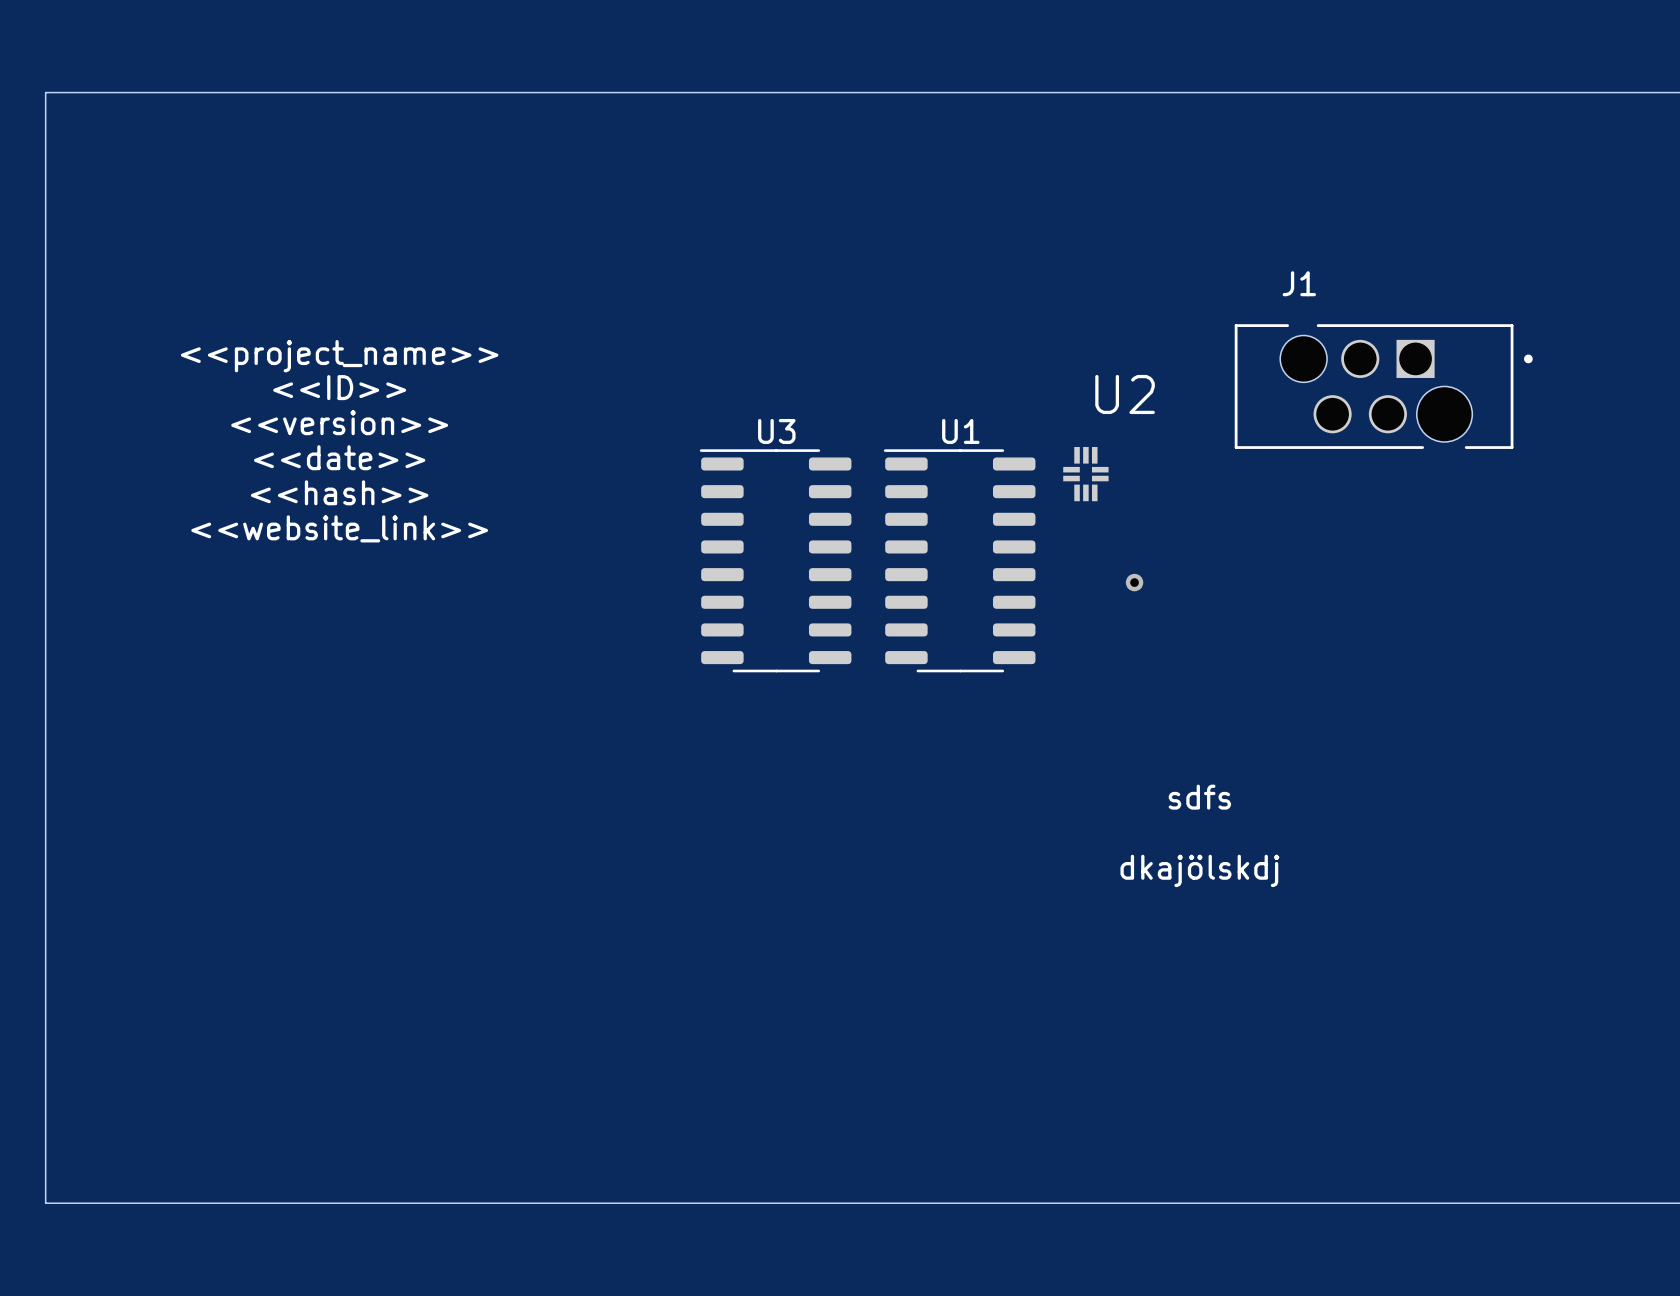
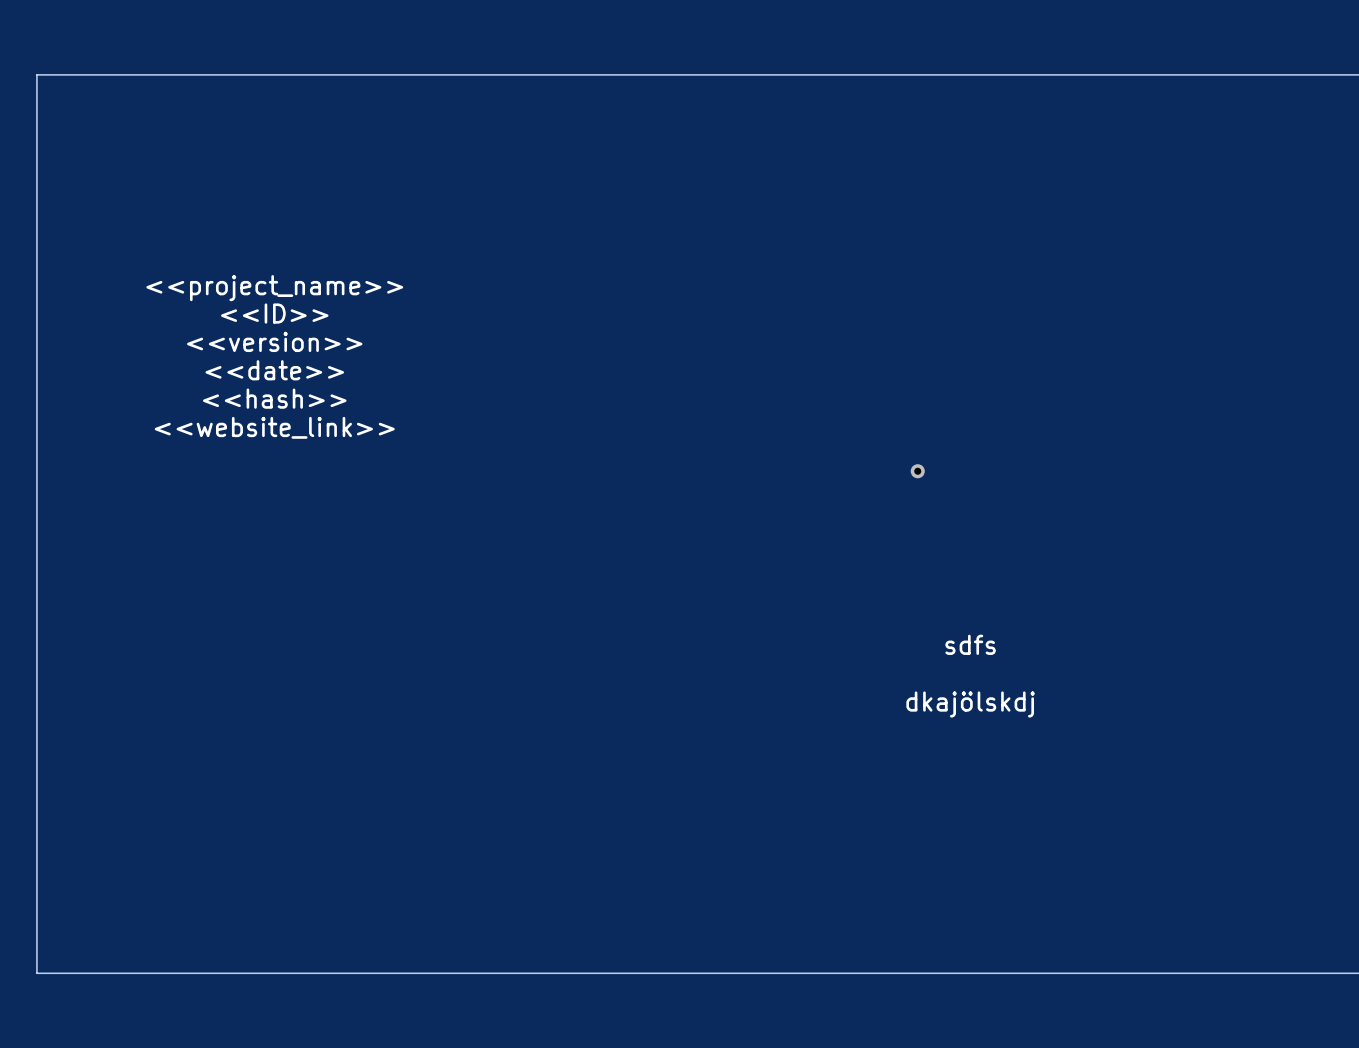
J1: (1383, 386) -> none
U2: (1085, 474) -> none
U3: (775, 560) -> none
U1: (959, 560) -> none

